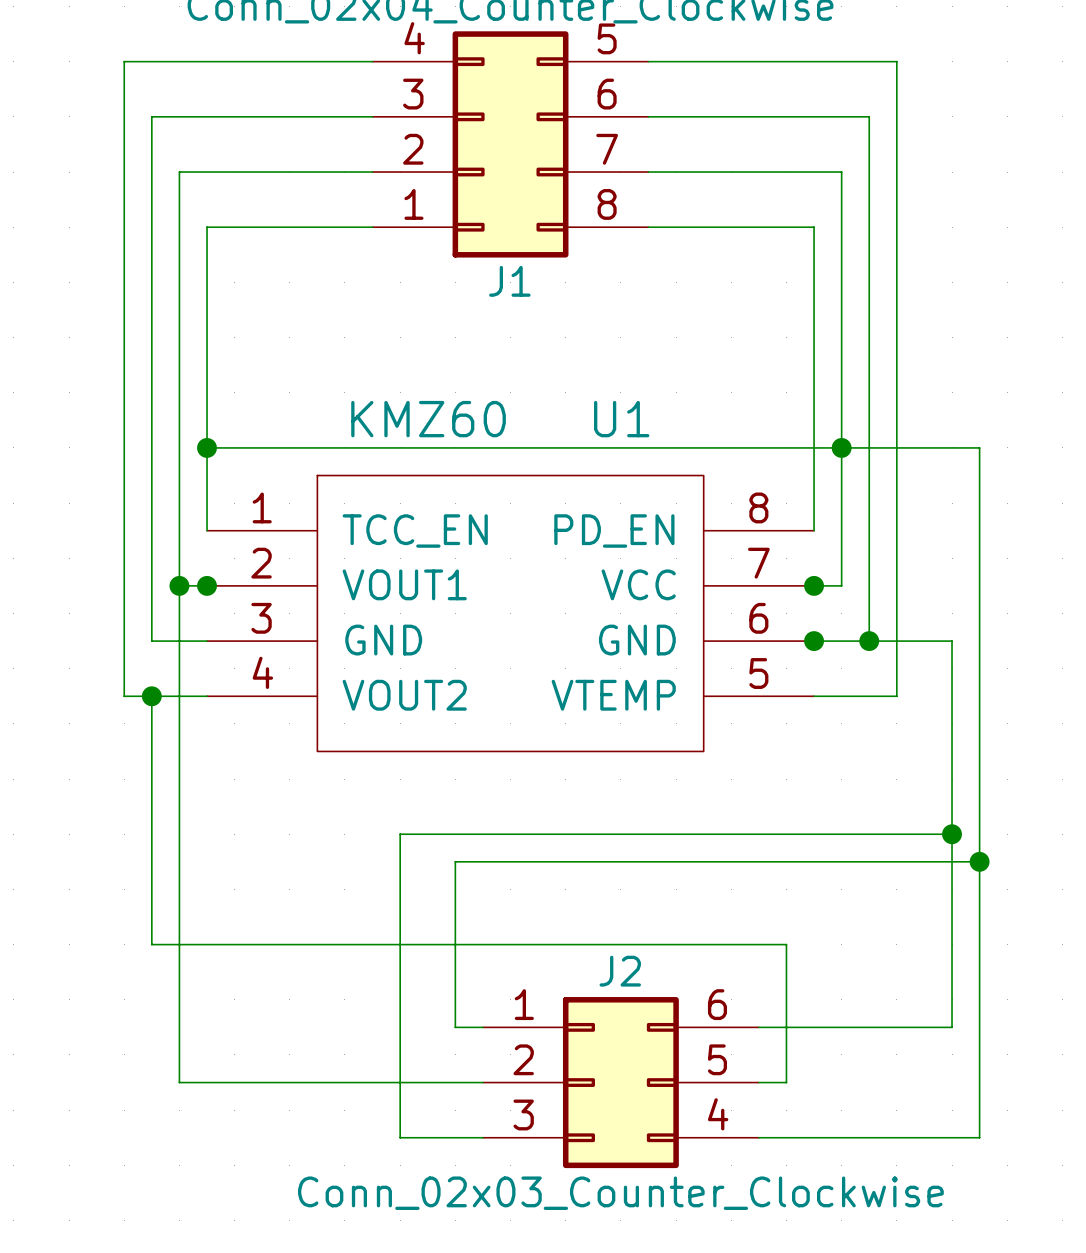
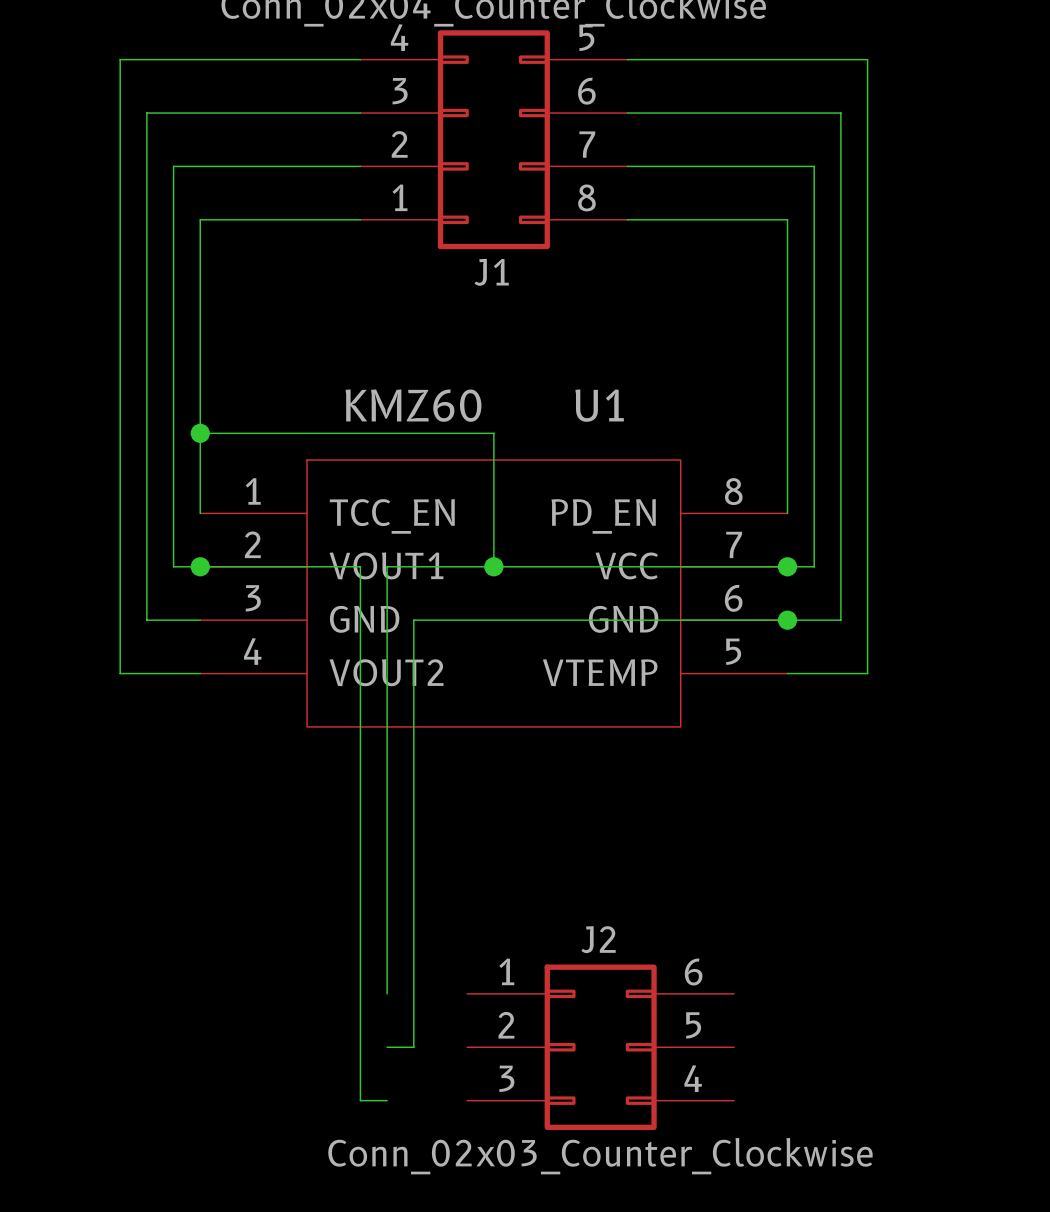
wire: (510, 447) (979, 447) (979, 1137) (758, 1137) -> (493, 433) (493, 566)
junction: (841, 447) -> none
wire: (179, 585) (179, 1082) (400, 1082) -> none
junction: (179, 585) -> none
wire: none -> (200, 566) (360, 566) (360, 1100) (387, 1100)
junction: none -> (493, 566)
wire: (869, 641) (952, 641) (952, 1027) (758, 1027) -> none
junction: (869, 641) -> none
wire: (151, 696) (151, 944) (786, 944) (786, 1082) (758, 1082) -> none
junction: (151, 696) -> none
wire: (400, 834) (952, 834) -> (387, 807) (387, 566) (787, 566)
junction: (952, 834) -> none
wire: (979, 861) (455, 861) (455, 1027) (482, 1027) -> none
junction: (979, 861) -> none
wire: (400, 1027) (400, 1137) (482, 1137) -> none
wire: (427, 1082) (482, 1082) -> (413, 1047) (413, 620) (787, 620)

